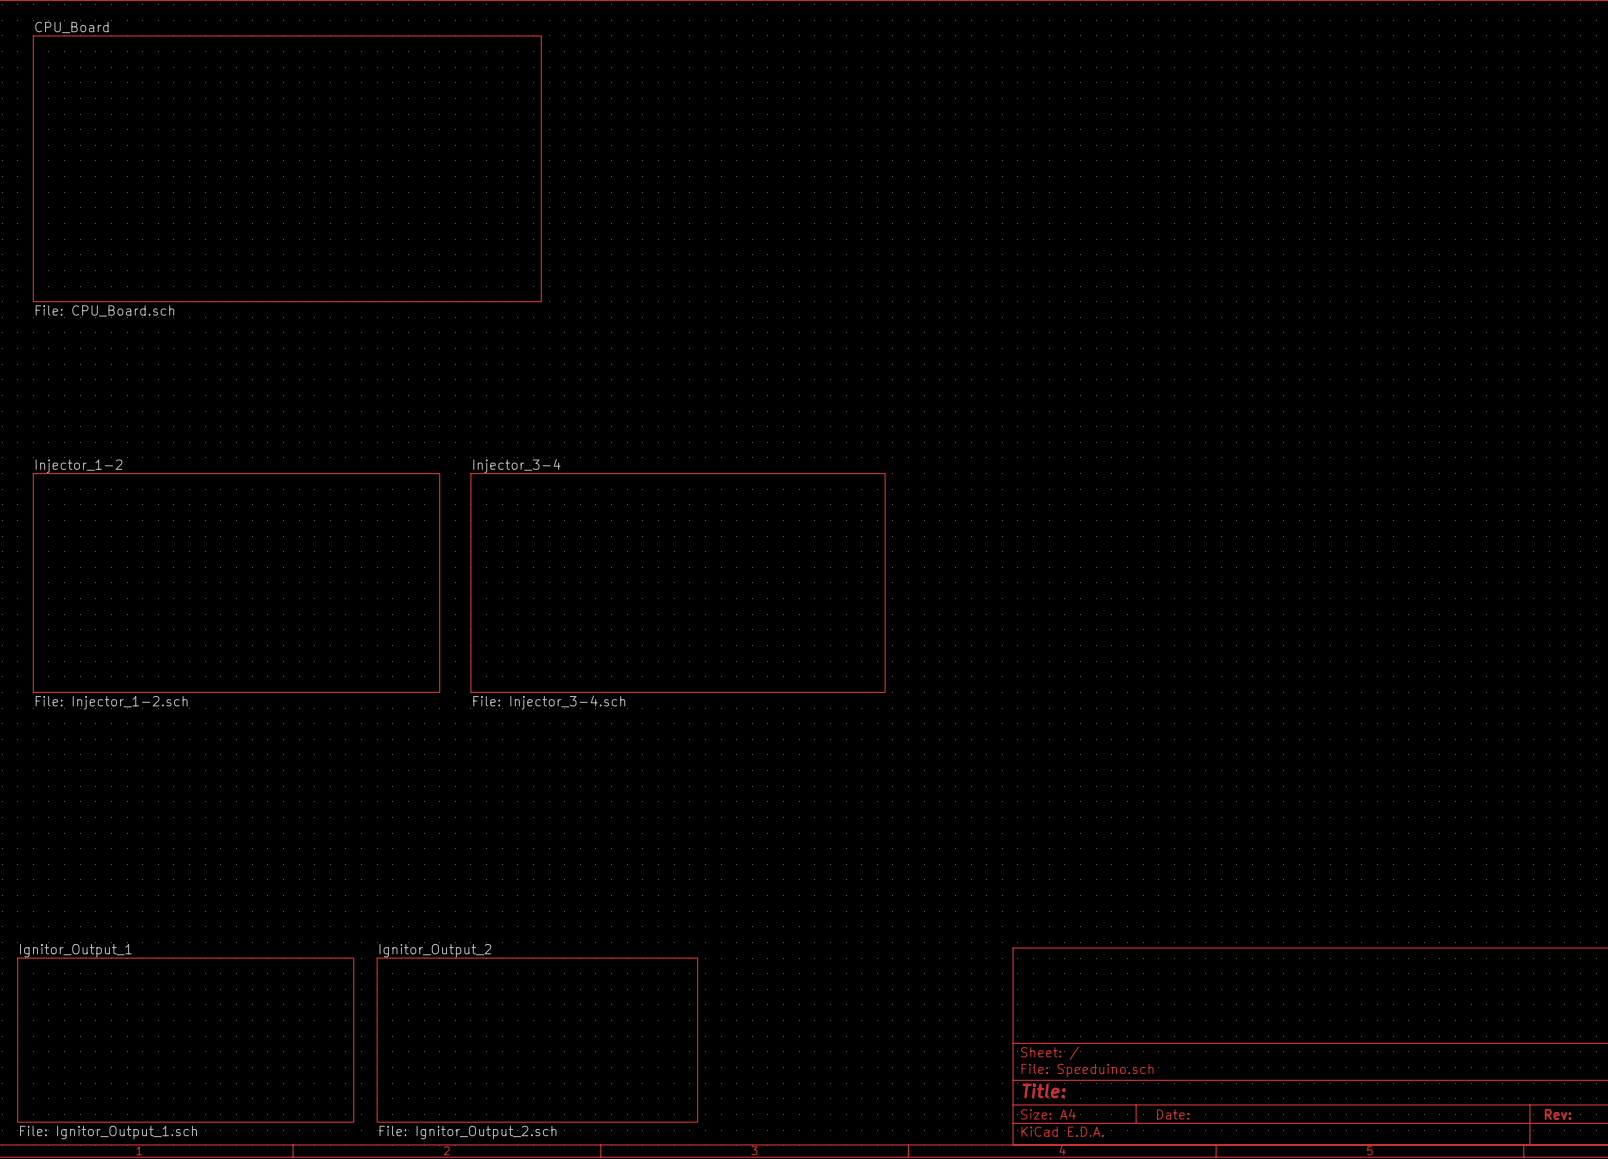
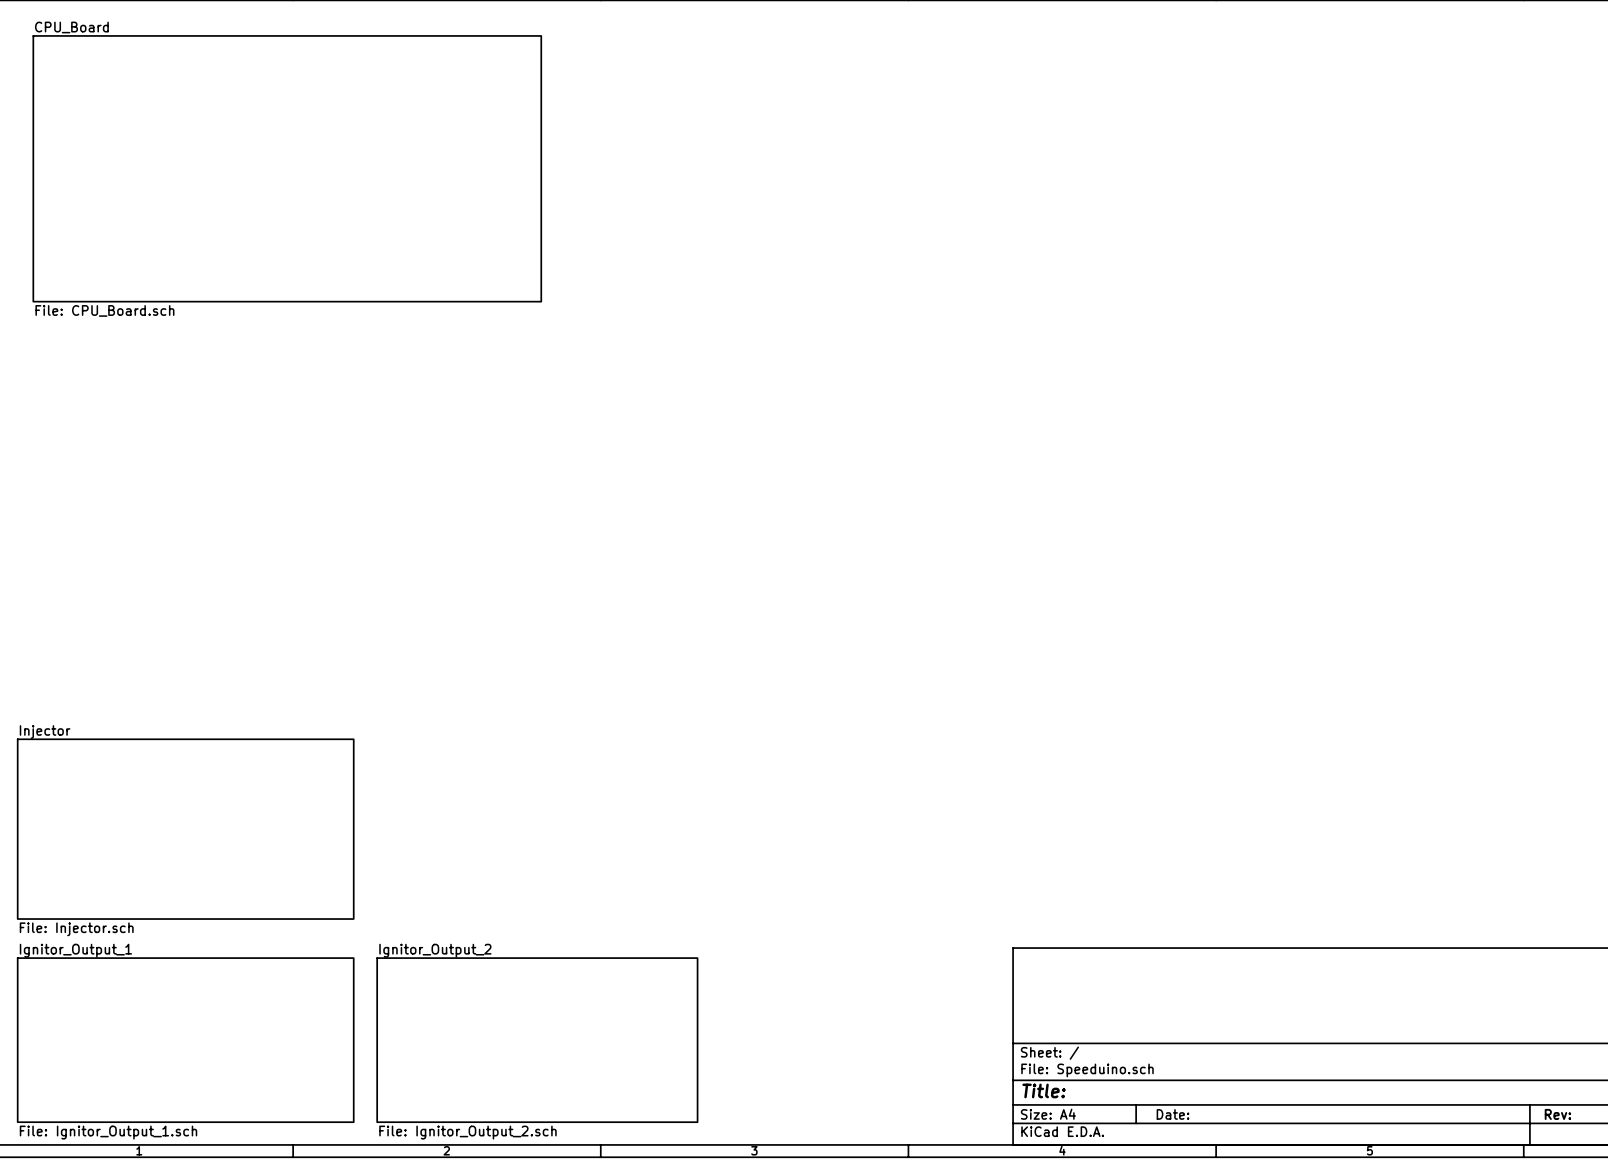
sheet Injector_1-2: File: Injector_1-2.sch (236, 582) -> none
sheet Injector_3-4: File: Injector_3-4.sch (678, 582) -> none
sheet Injector: none -> File: Injector.sch (185, 829)

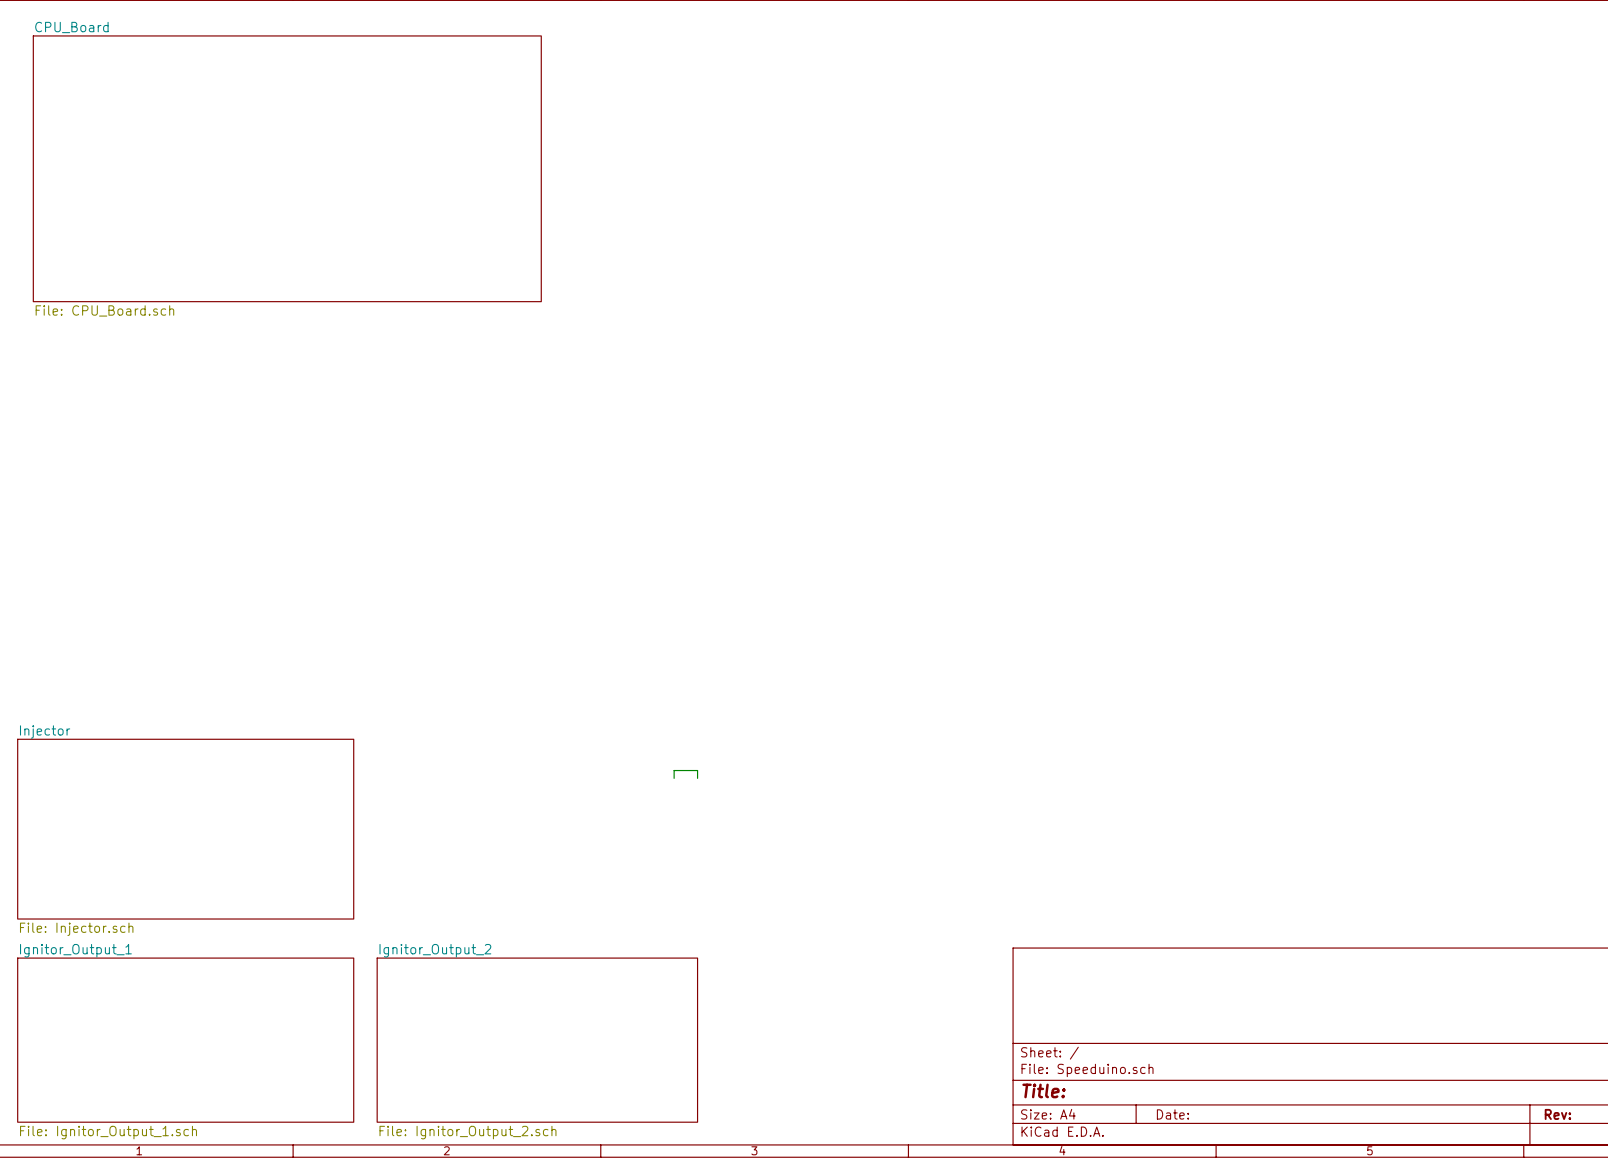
wire: none -> (674, 778) (674, 770) (697, 770) (697, 778)

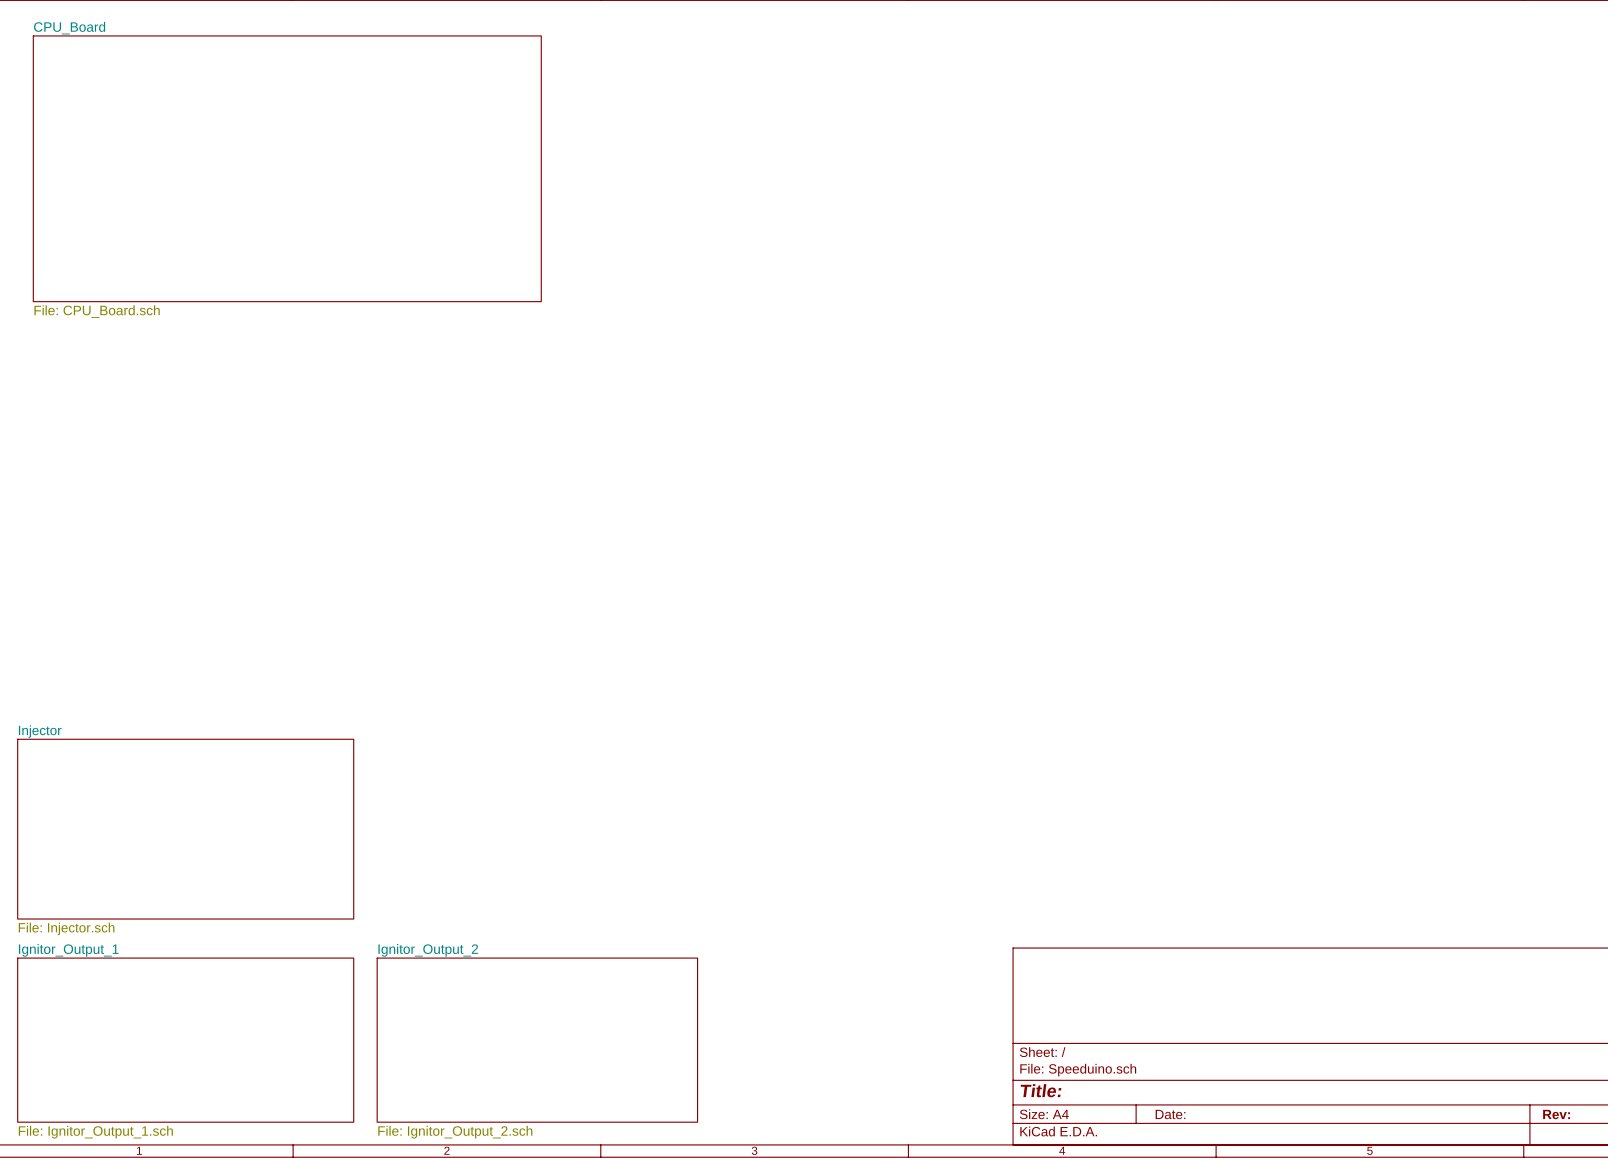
wire: (674, 778) (674, 770) (697, 770) (697, 778) -> none

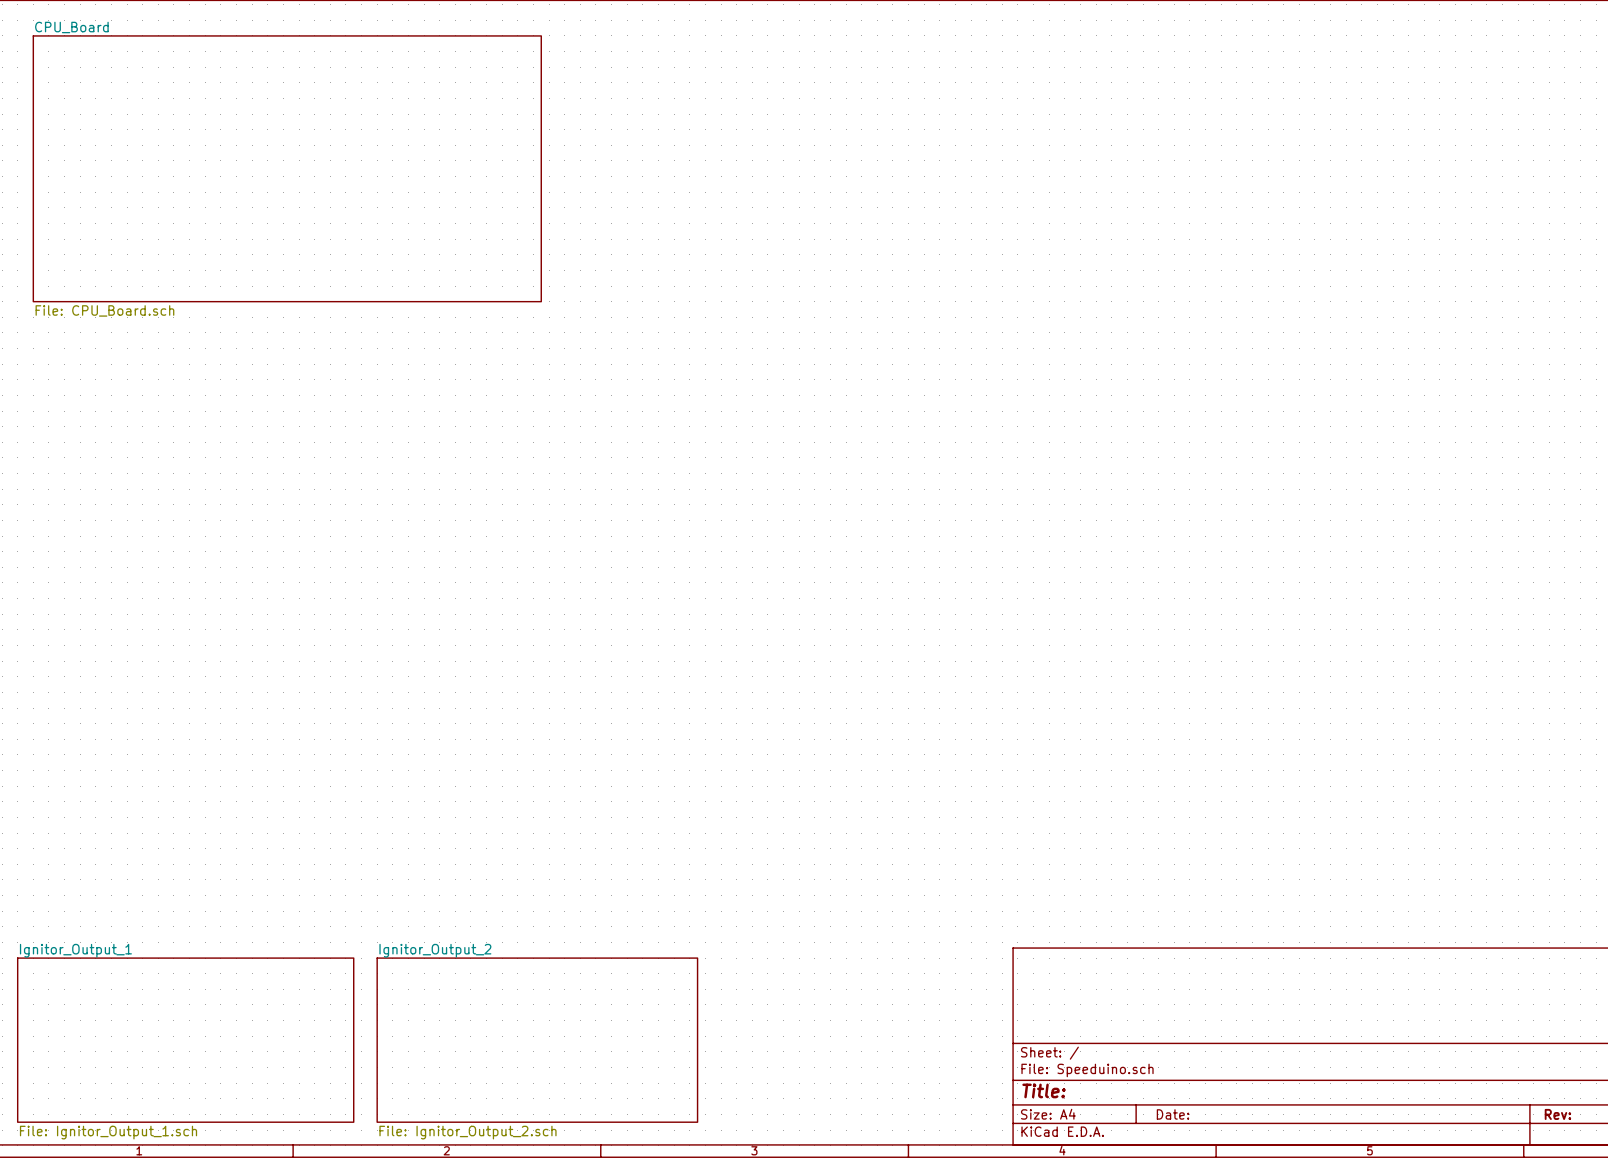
sheet Injector: File: Injector.sch (185, 829) -> none

